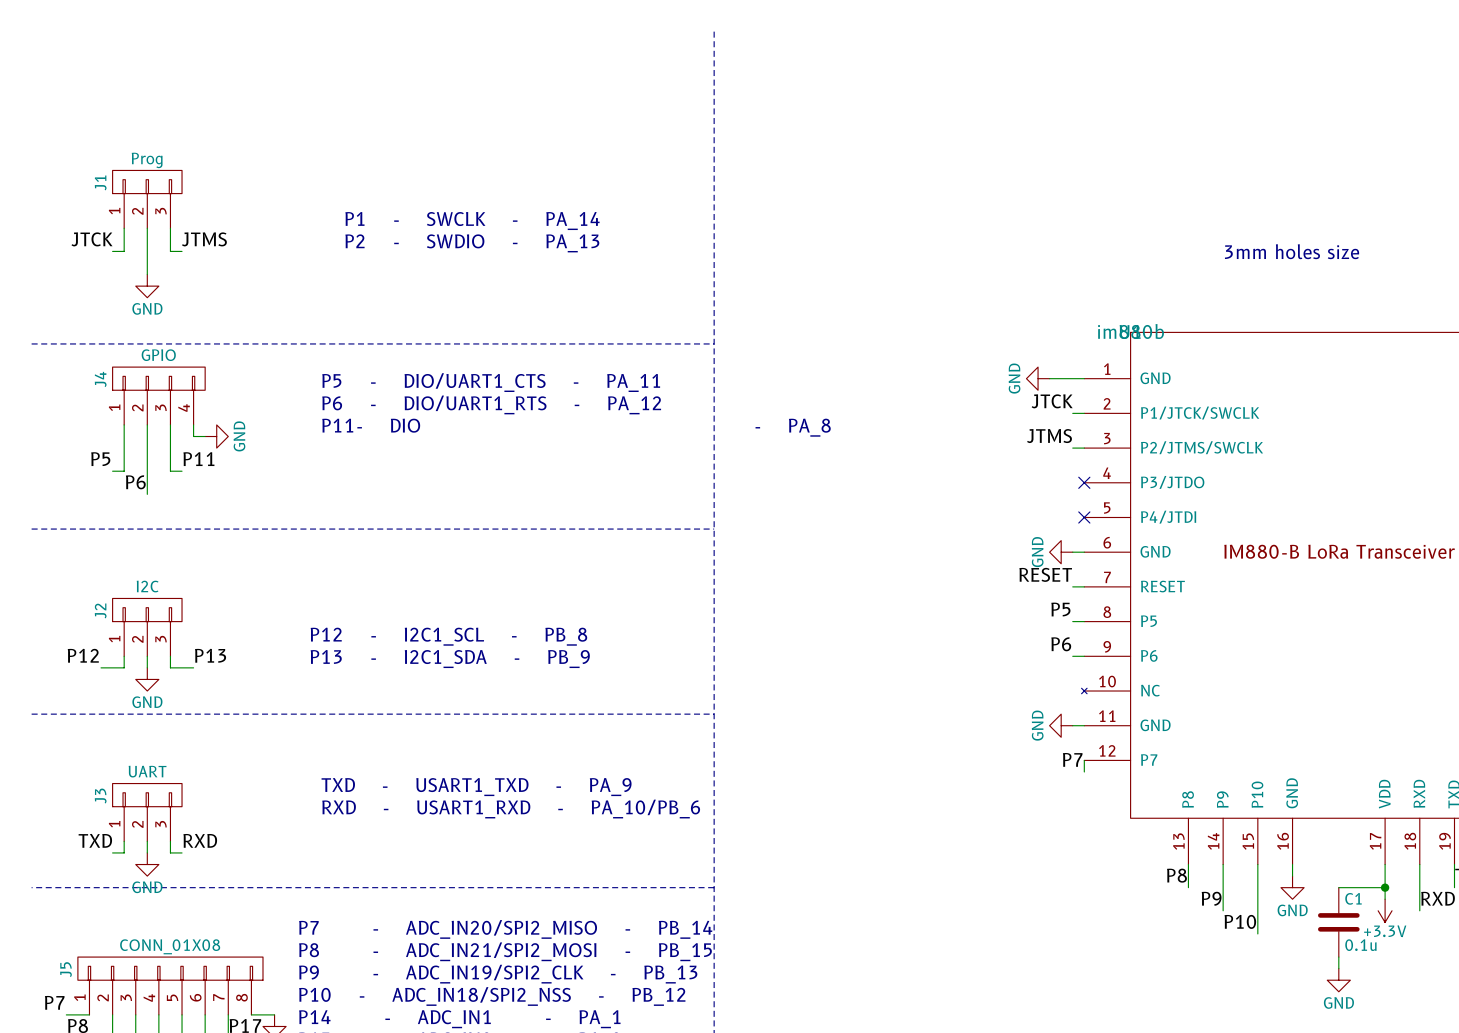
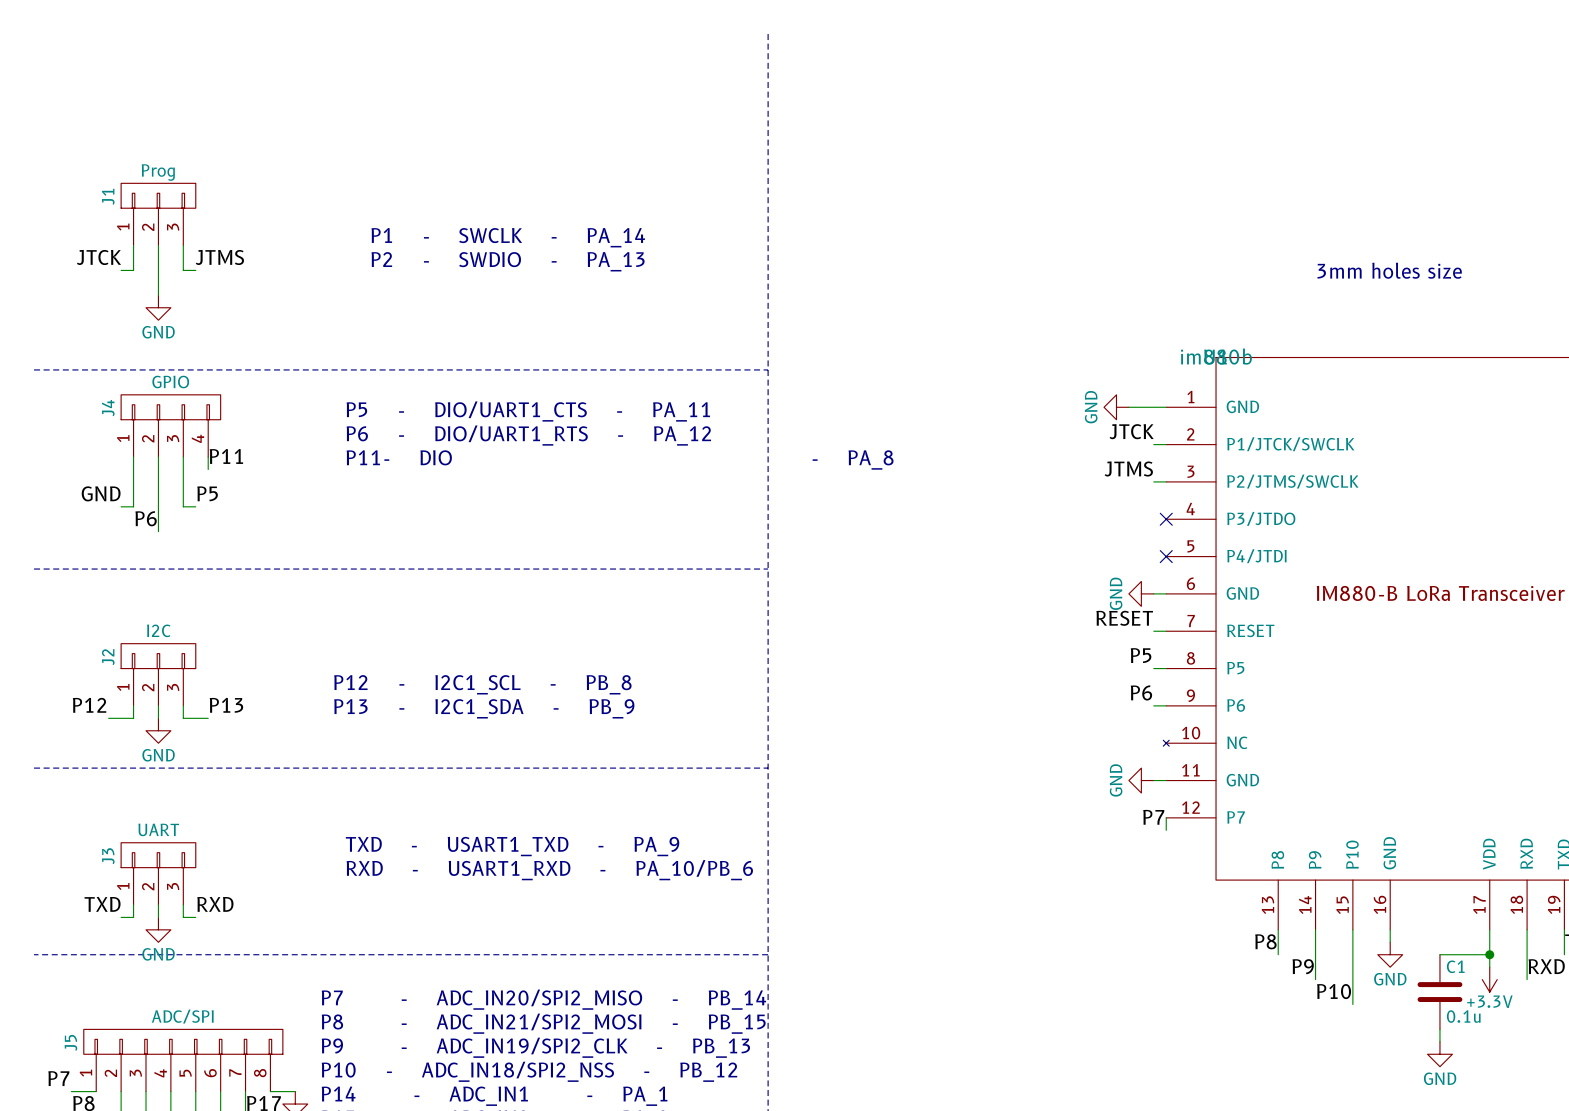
label: none -> P11 (226, 456)
wire: (193, 436) (205, 436) -> none
power symbol: GND (216, 436) -> none
label: P5 (100, 459) -> GND (101, 493)
label: P11 (198, 459) -> P5 (207, 493)
J5 value: CONN_01X08 (170, 946) -> ADC/SPI (182, 1016)

